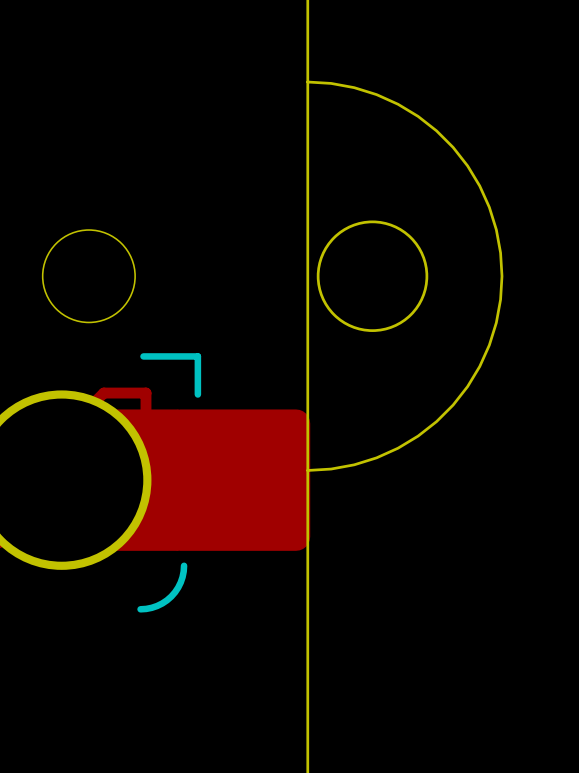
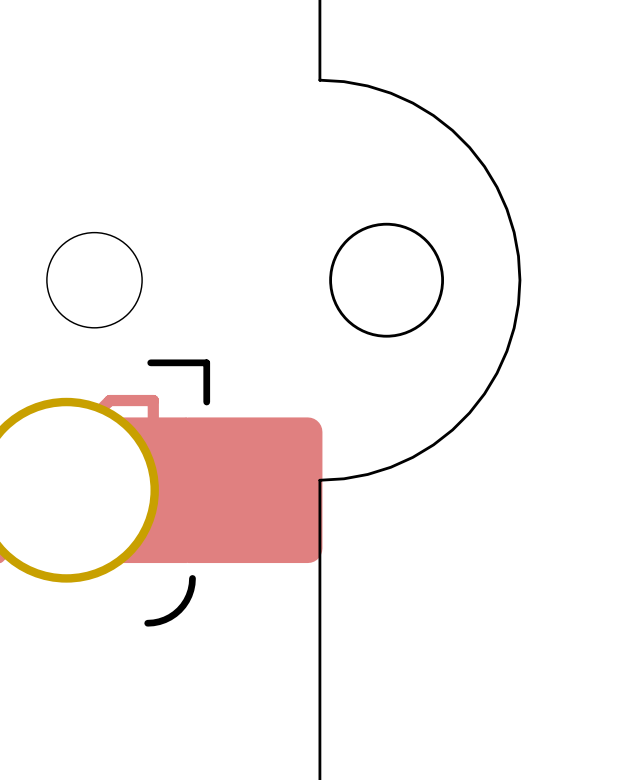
board edge: (307, 82) (307, 470) -> none

